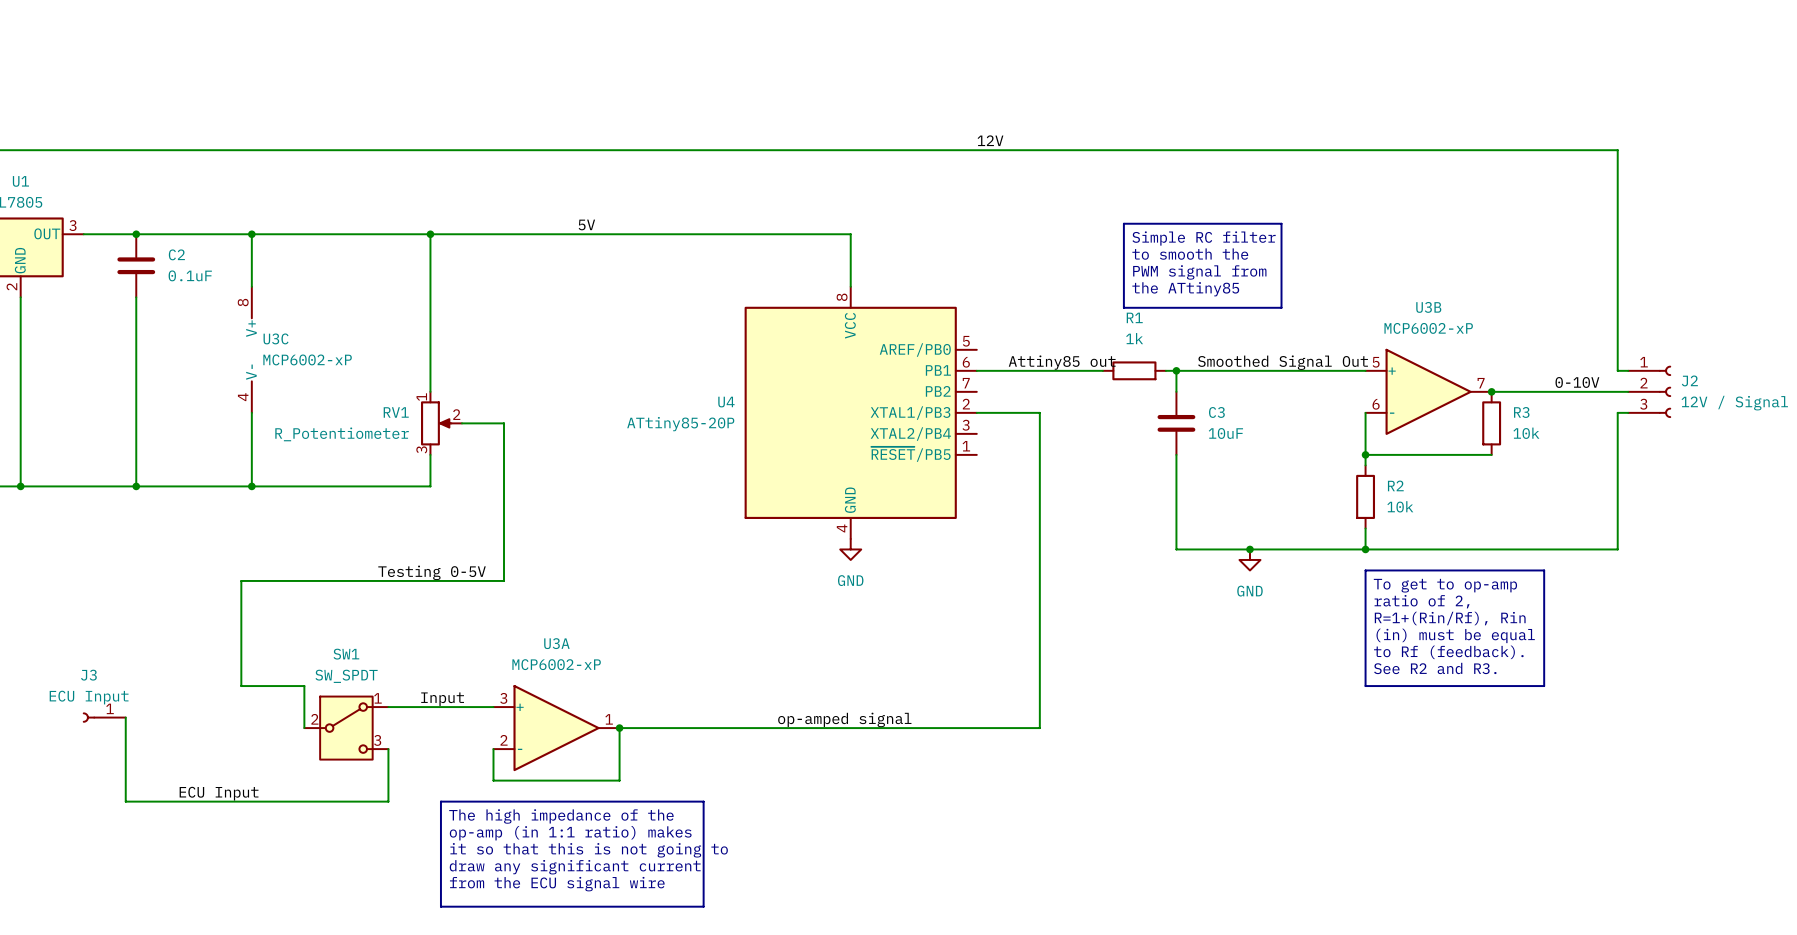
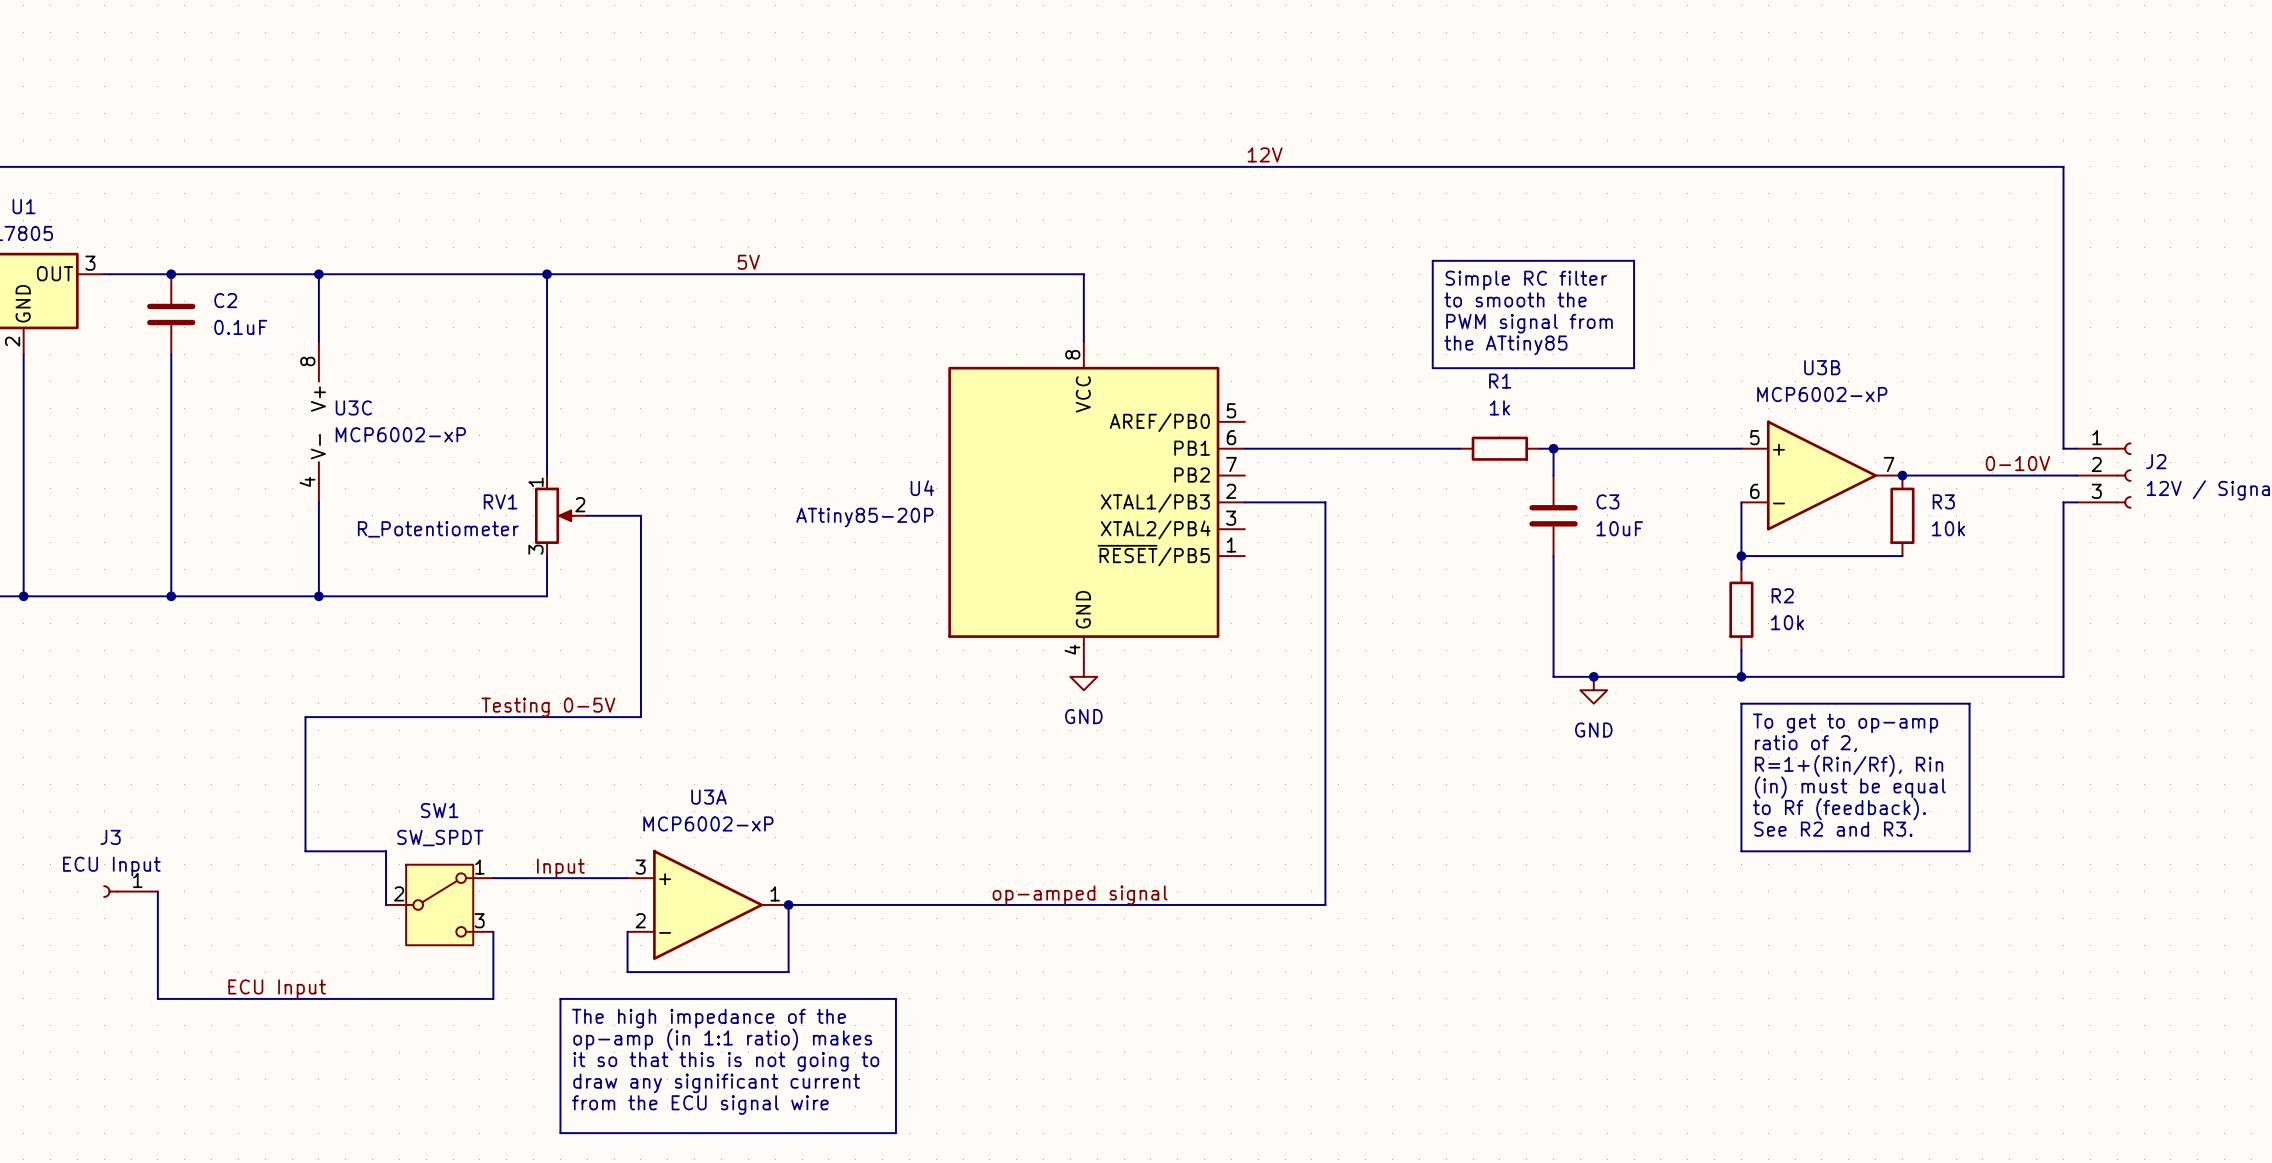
label: Attiny85 out (1062, 362) -> none
label: Smoothed Signal Out (1283, 362) -> none
R1 position: (1134, 370) -> (1499, 448)
wire: (1165, 370) (1207, 370) -> (1405, 448) (1459, 448)
wire: (1176, 370) (1176, 391) -> (1553, 448) (1553, 475)
junction position: (1176, 370) -> (1553, 448)
C3 position: (1176, 423) -> (1553, 515)
wire: (1176, 454) (1176, 549) (1218, 549) -> (1553, 556) (1553, 676)

